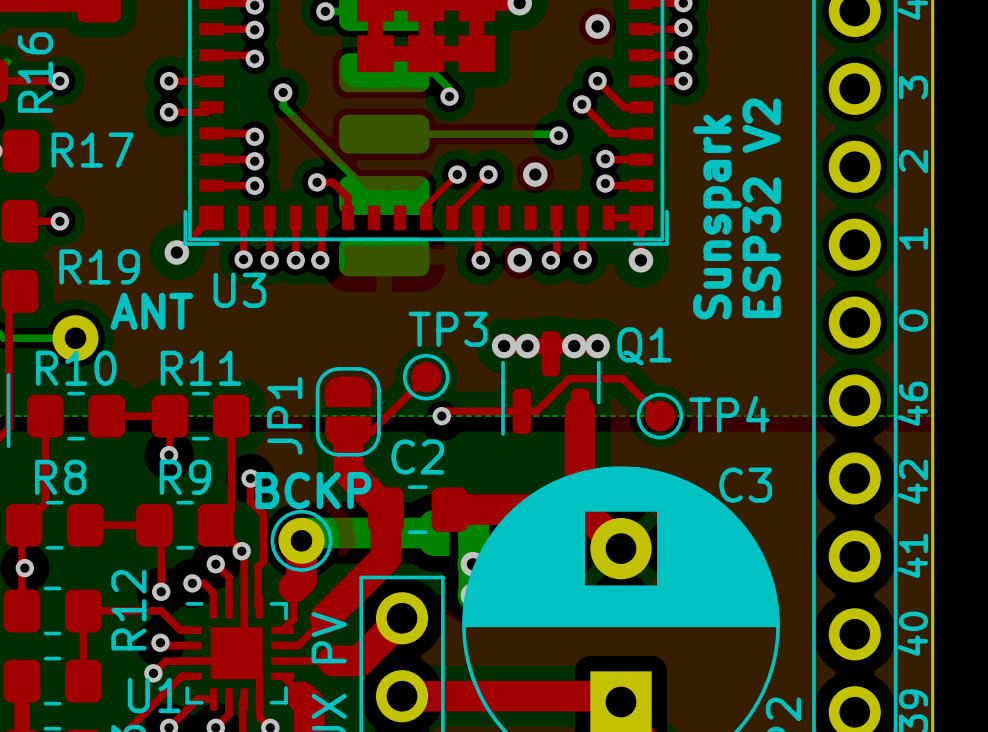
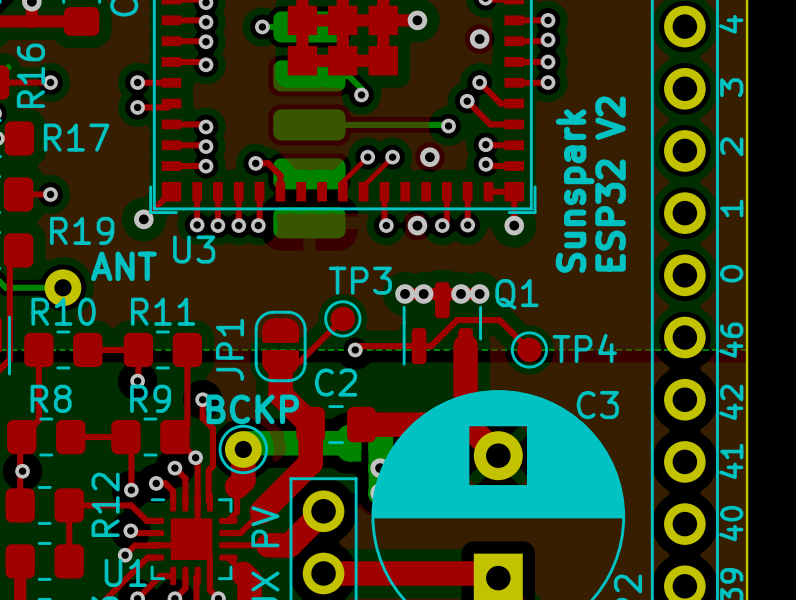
bottom track: (283, 92) (283, 106) (372, 195) (384, 195) -> none
via: (283, 92) -> none

